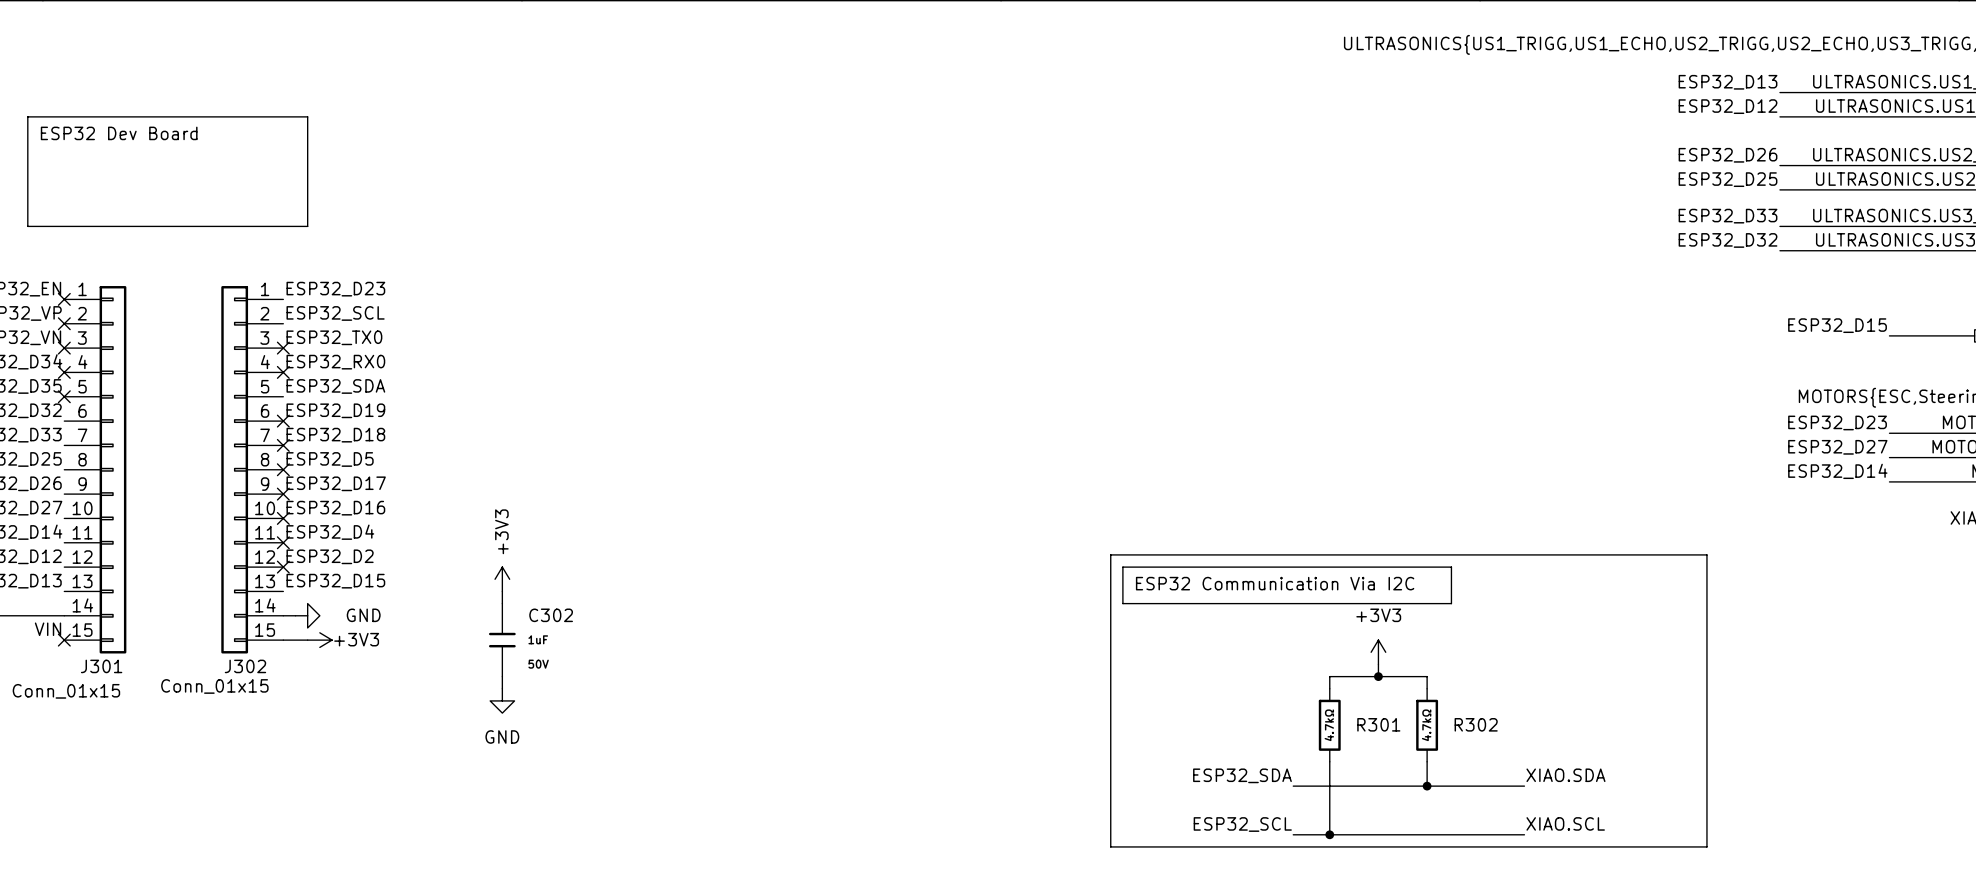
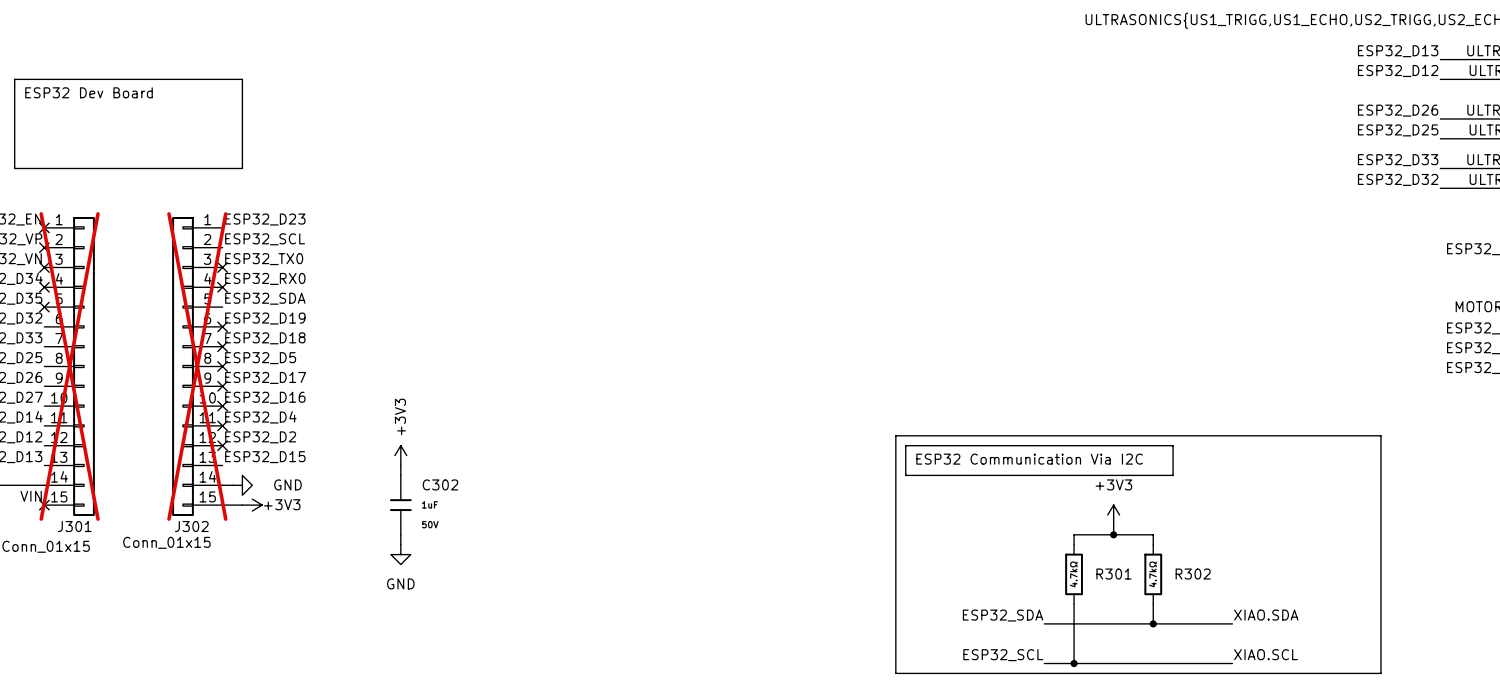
J301 do-not-place cross: none -> (69, 366)
J302 do-not-place cross: none -> (197, 366)

